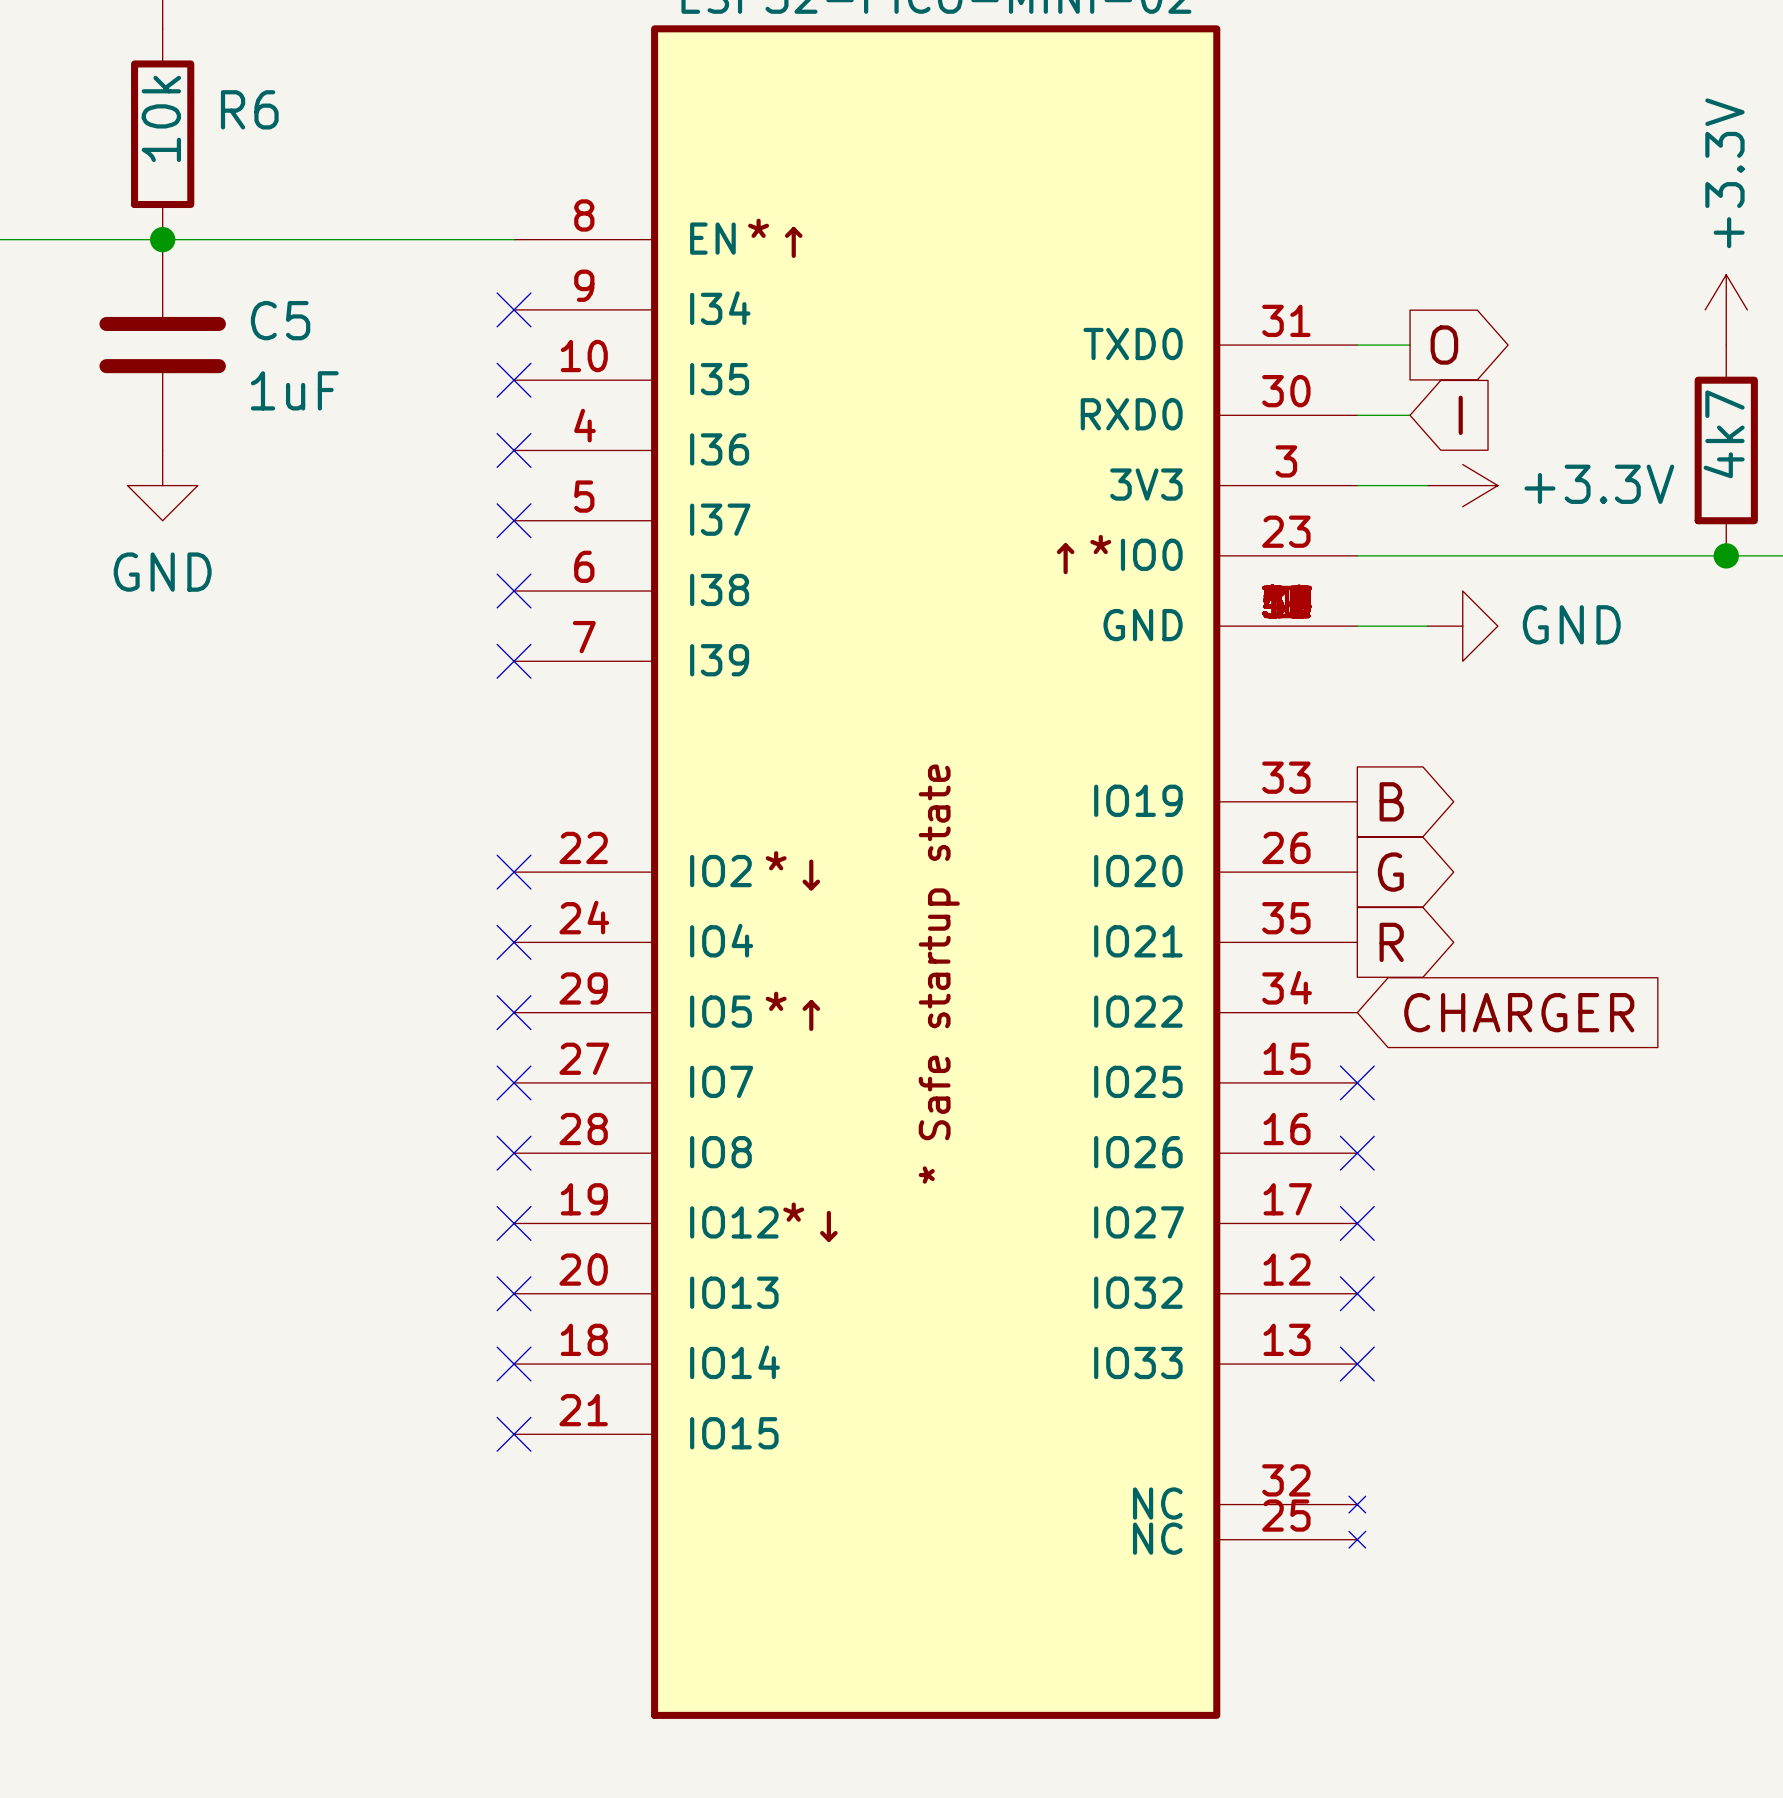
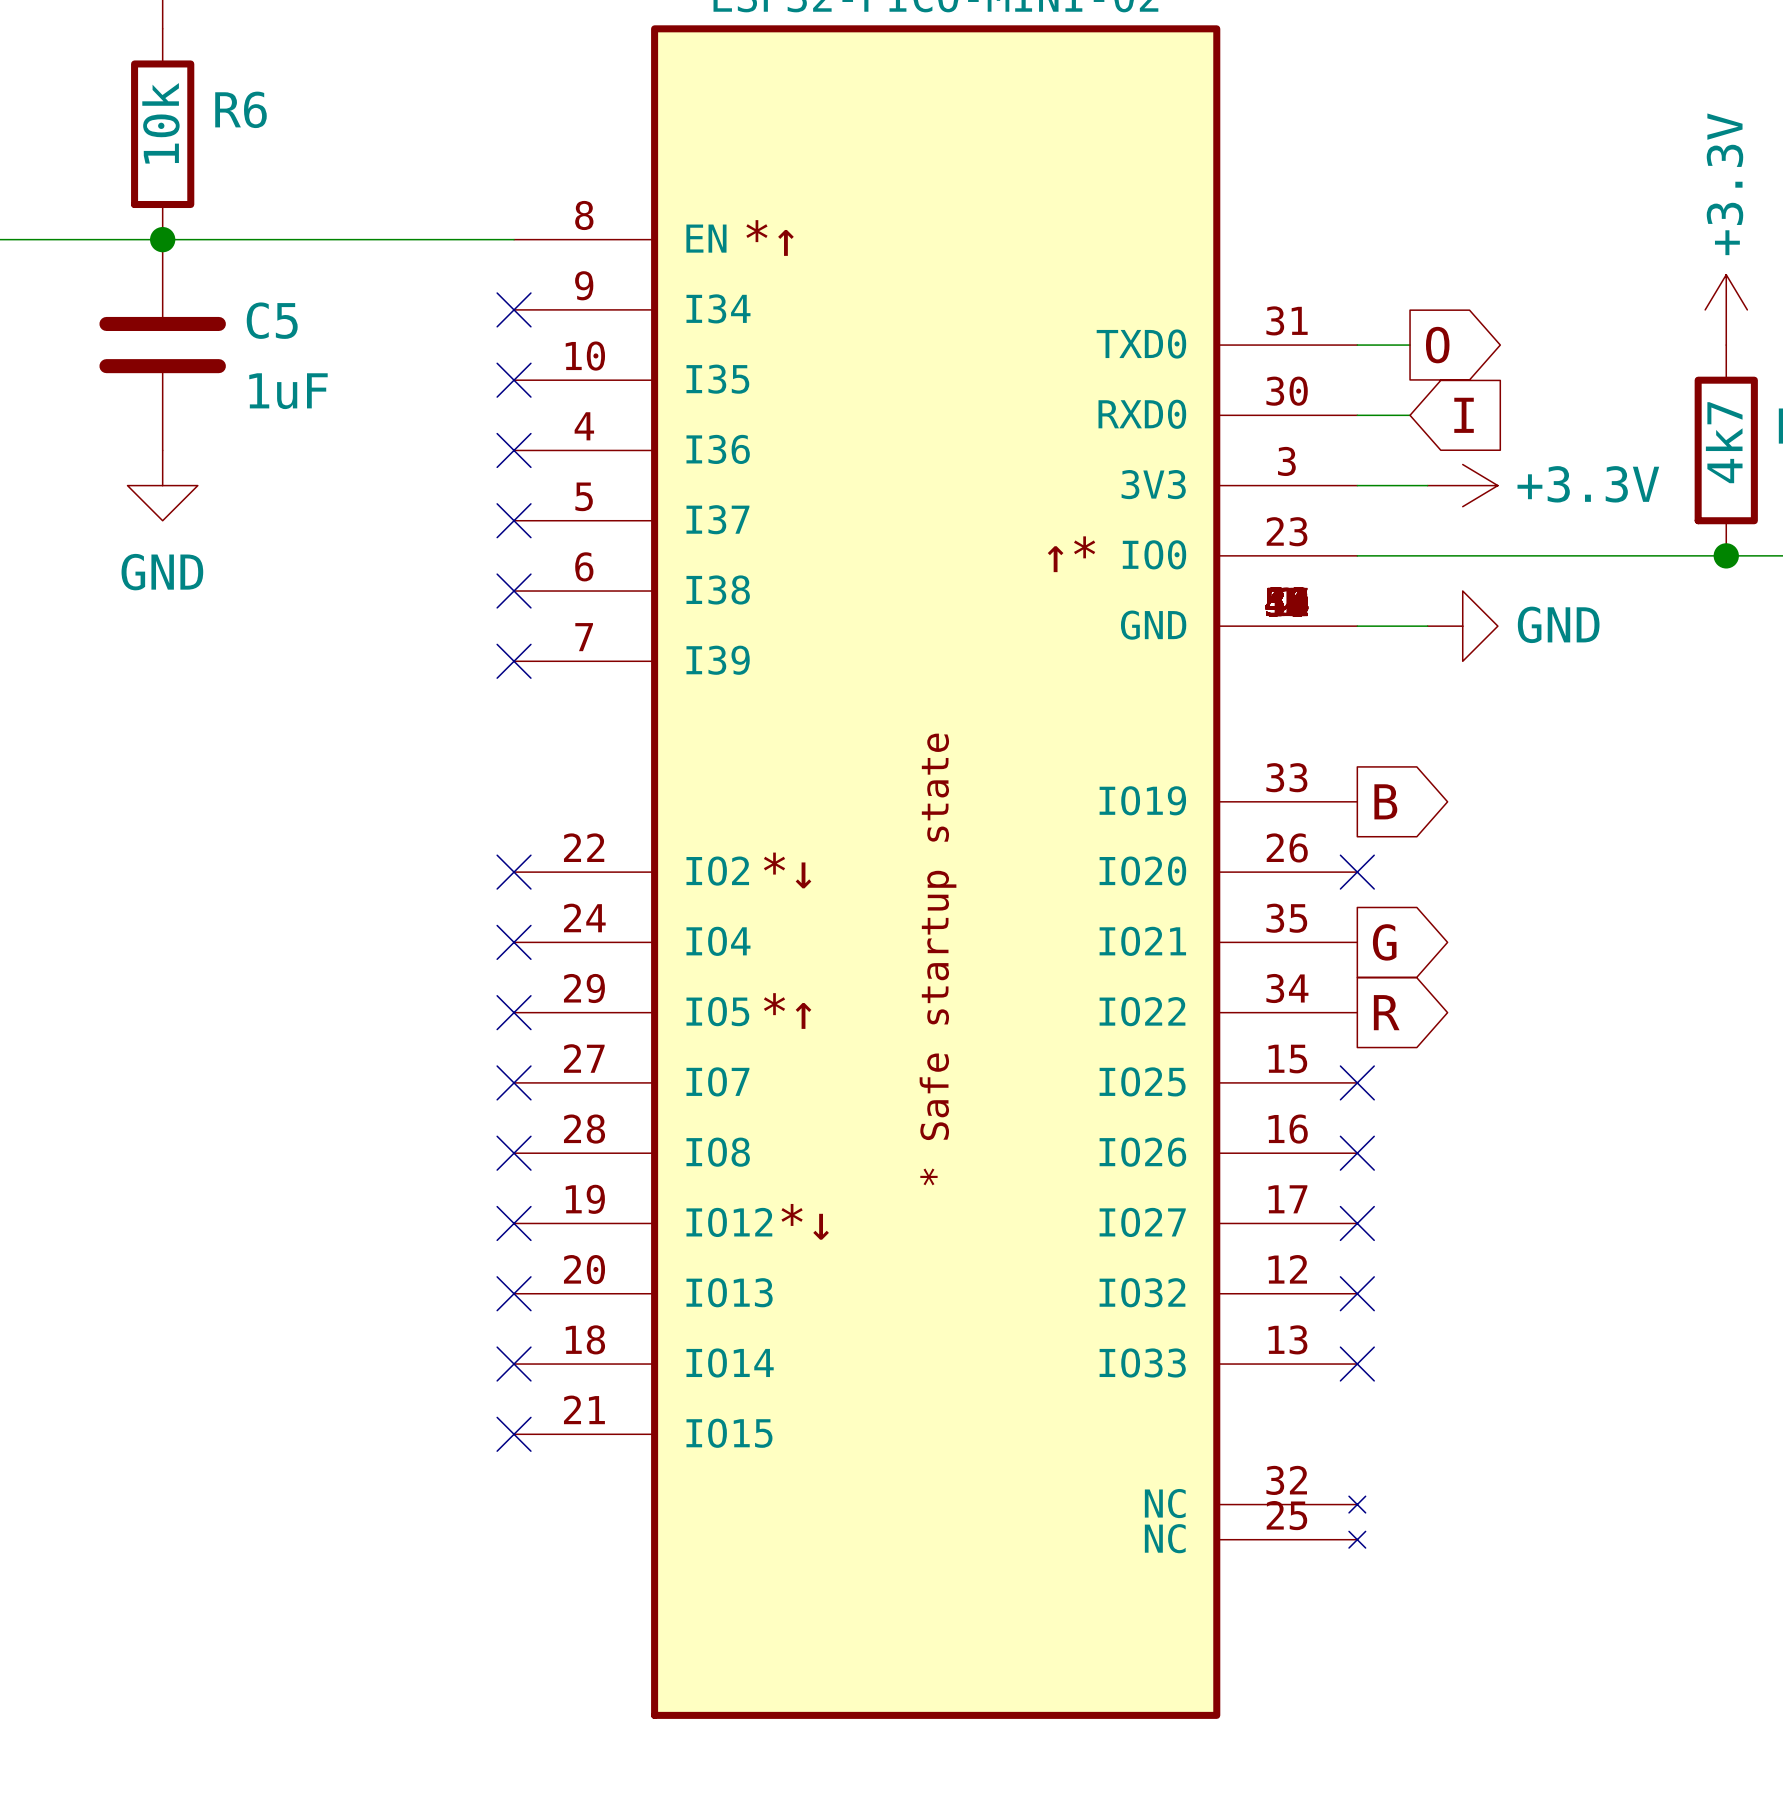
no-connect mark: none -> (1357, 872)
global label: G (1390, 872) -> none
global label: R (1391, 942) -> G (1384, 942)
global label shape: input (1519, 1012) -> output (1386, 1012)
global label: CHARGER (1519, 1012) -> R (1386, 1012)

